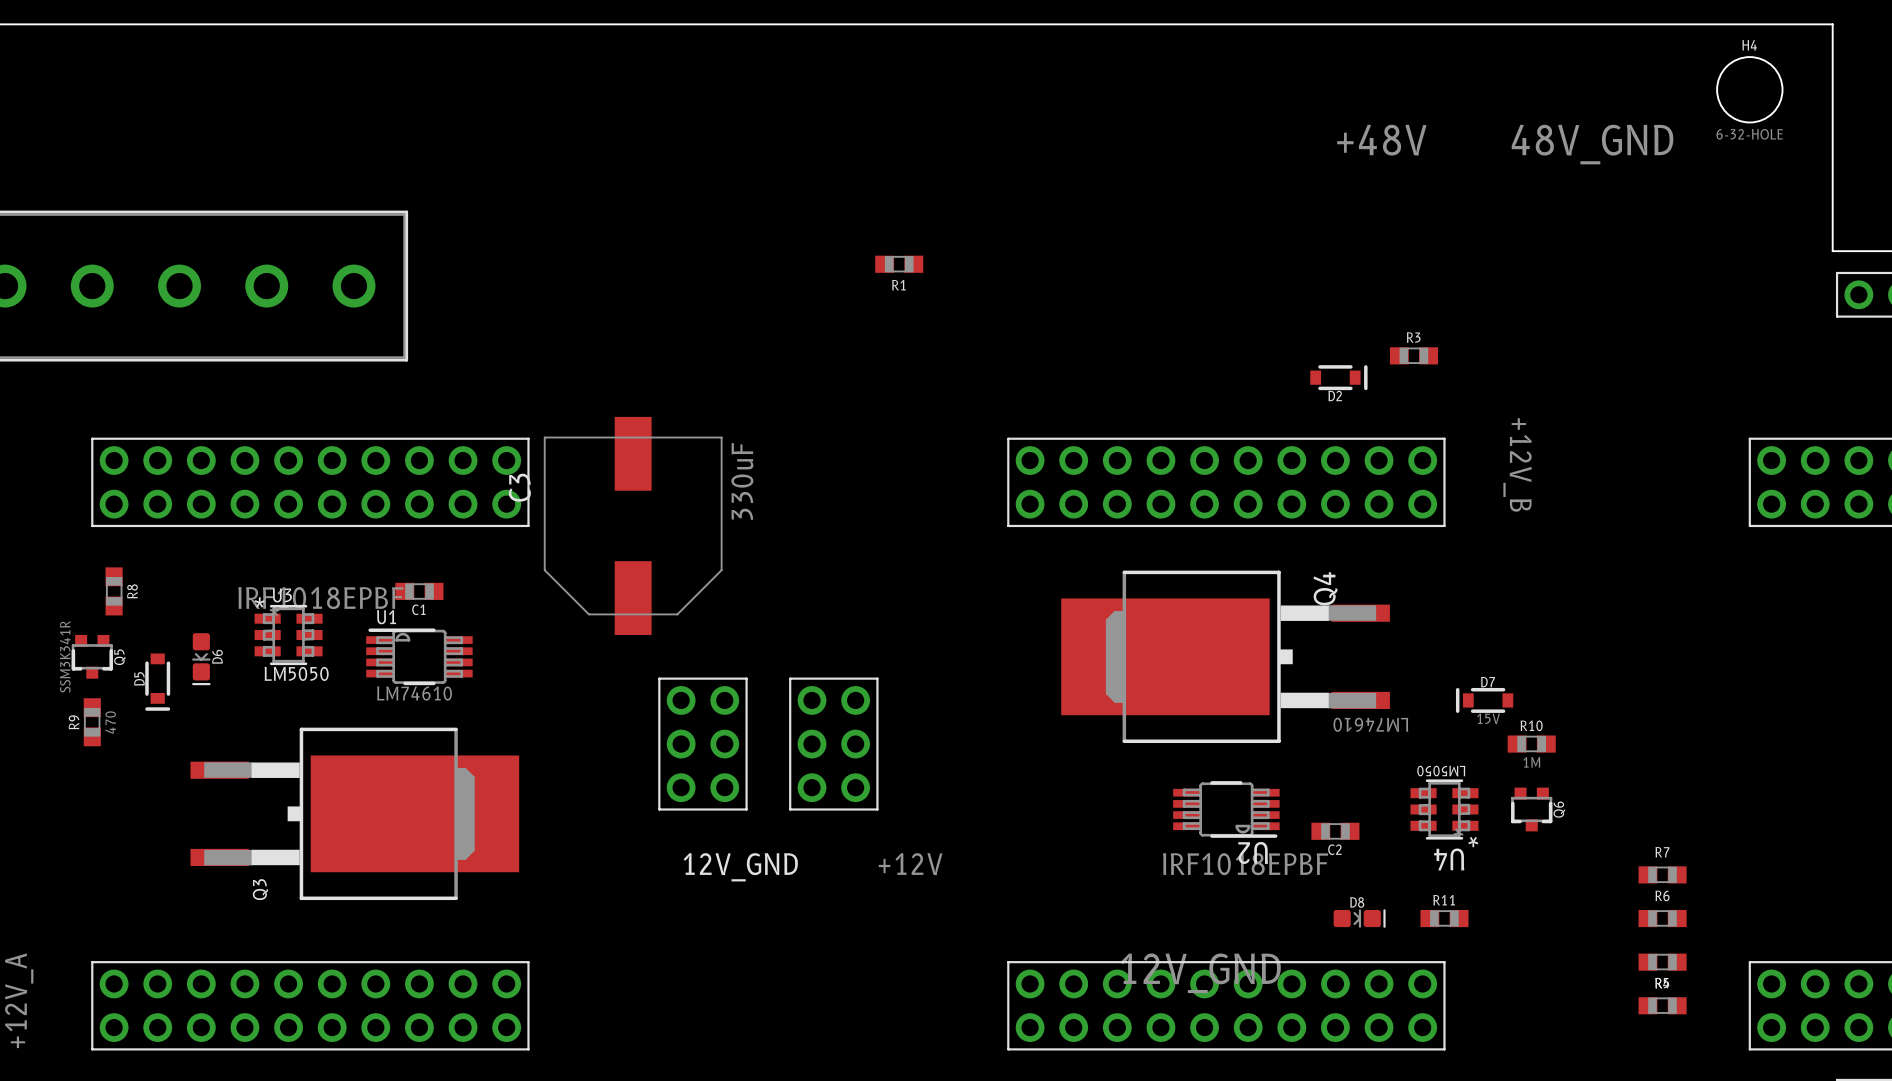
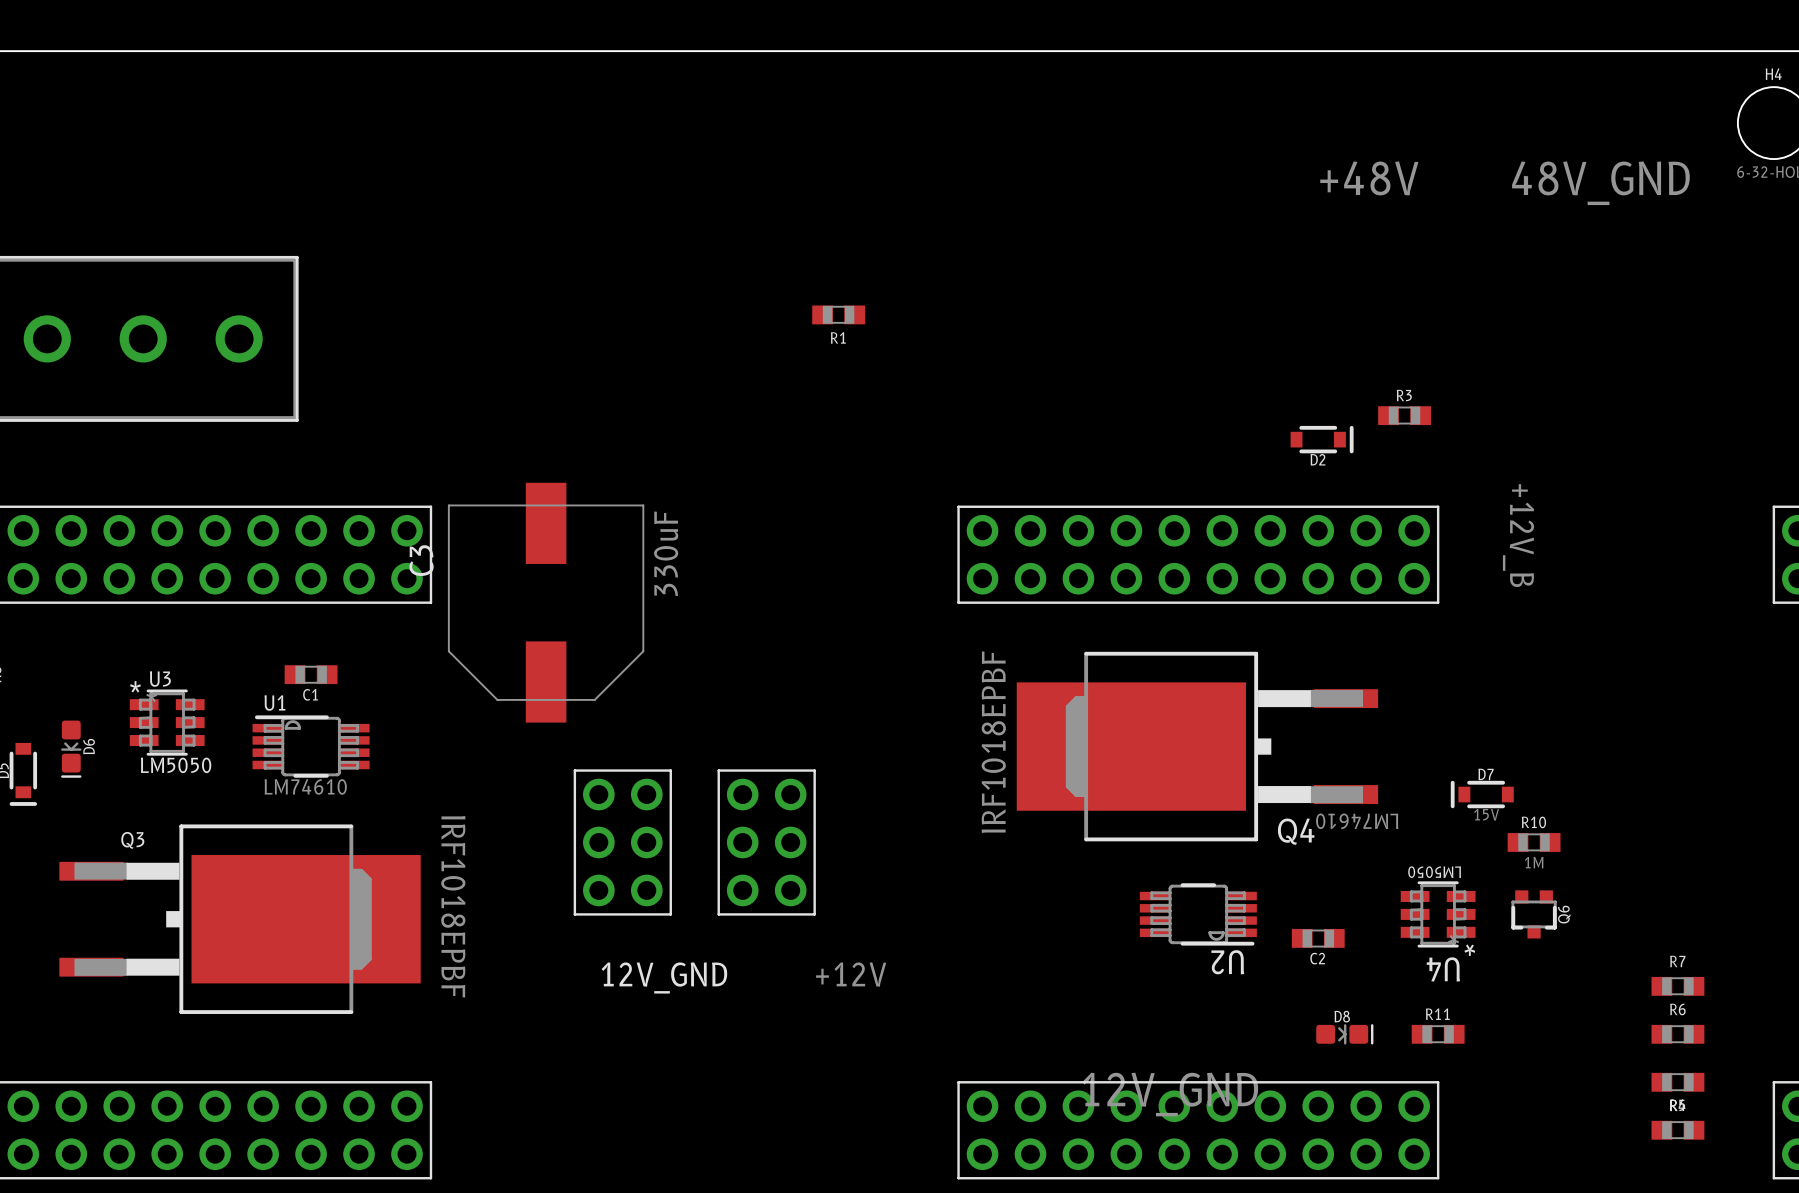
Q4 name rotation: 0° (1325, 588) -> 90° clockwise (1296, 831)
Q4 name position: Q4 (1325, 588) -> Q4 (1296, 831)
Q3 value rotation: 0° (320, 598) -> 90° clockwise (453, 906)
Q3 value position: IRF1018EPBF (320, 598) -> IRF1018EPBF (453, 906)
Q4 value rotation: 0° (1245, 864) -> 90° counterclockwise (993, 742)
Q4 value position: IRF1018EPBF (1245, 864) -> IRF1018EPBF (993, 742)
Q3 name rotation: 0° (260, 889) -> 90° clockwise (132, 840)
Q3 name position: Q3 (260, 889) -> Q3 (132, 840)

